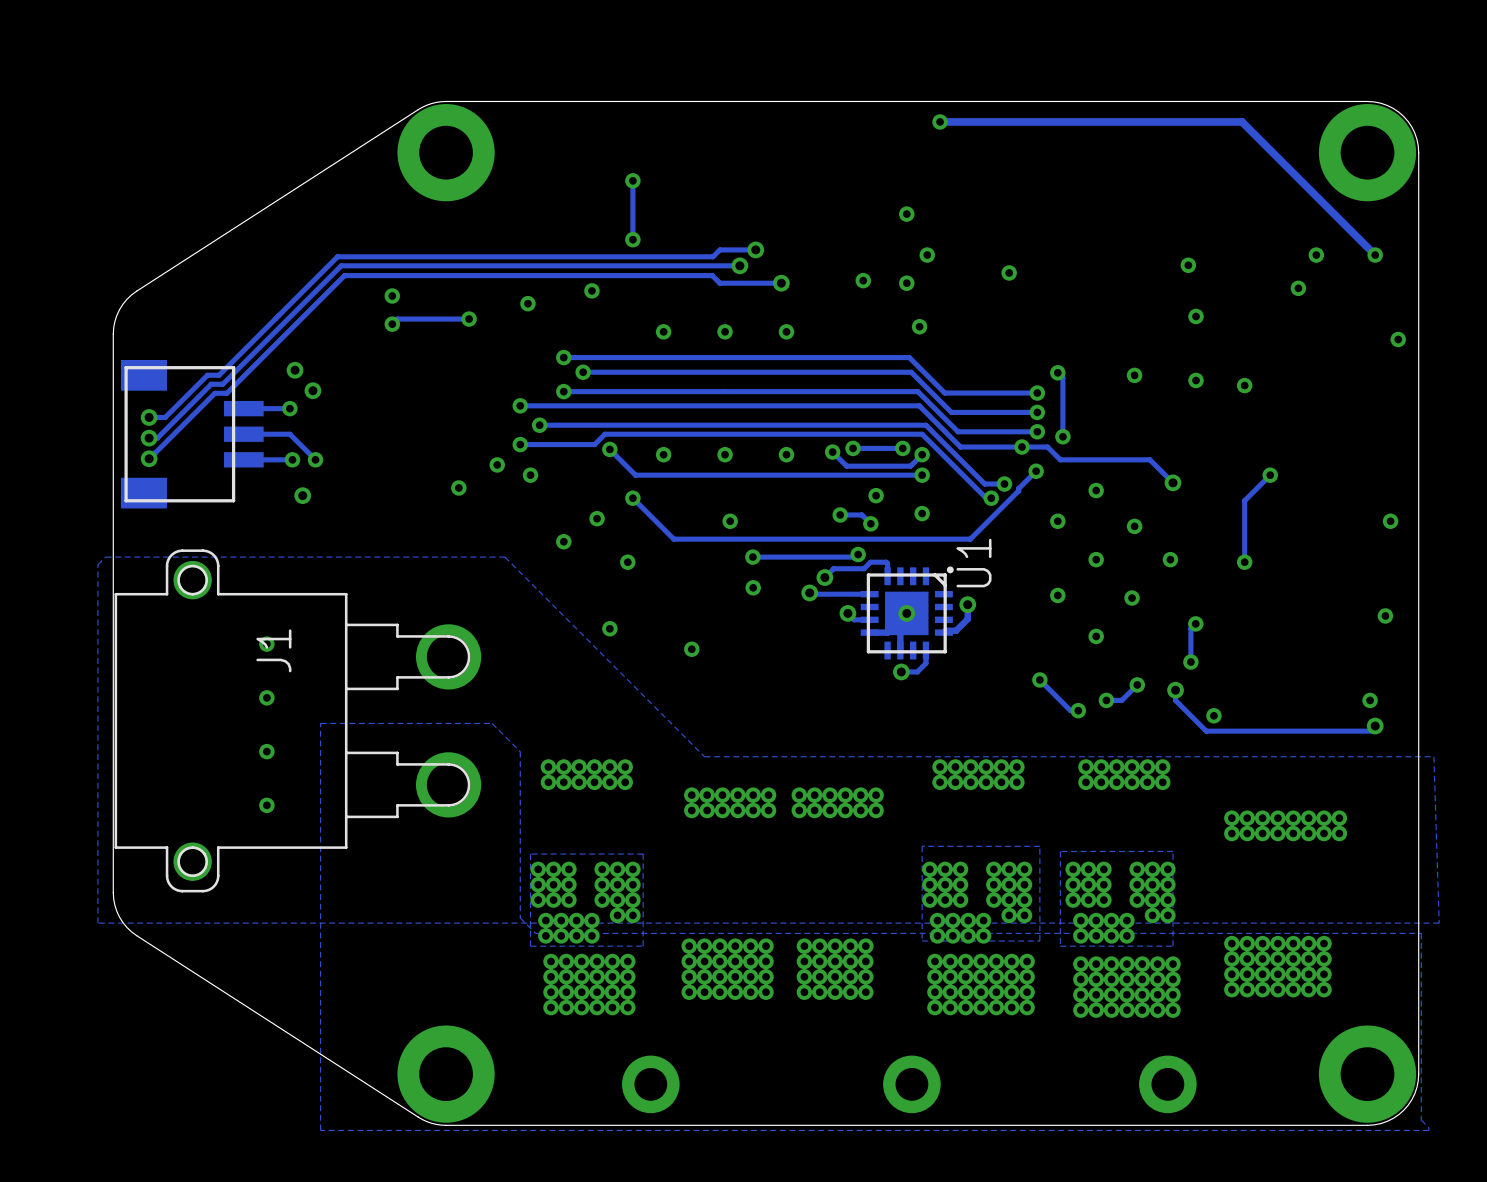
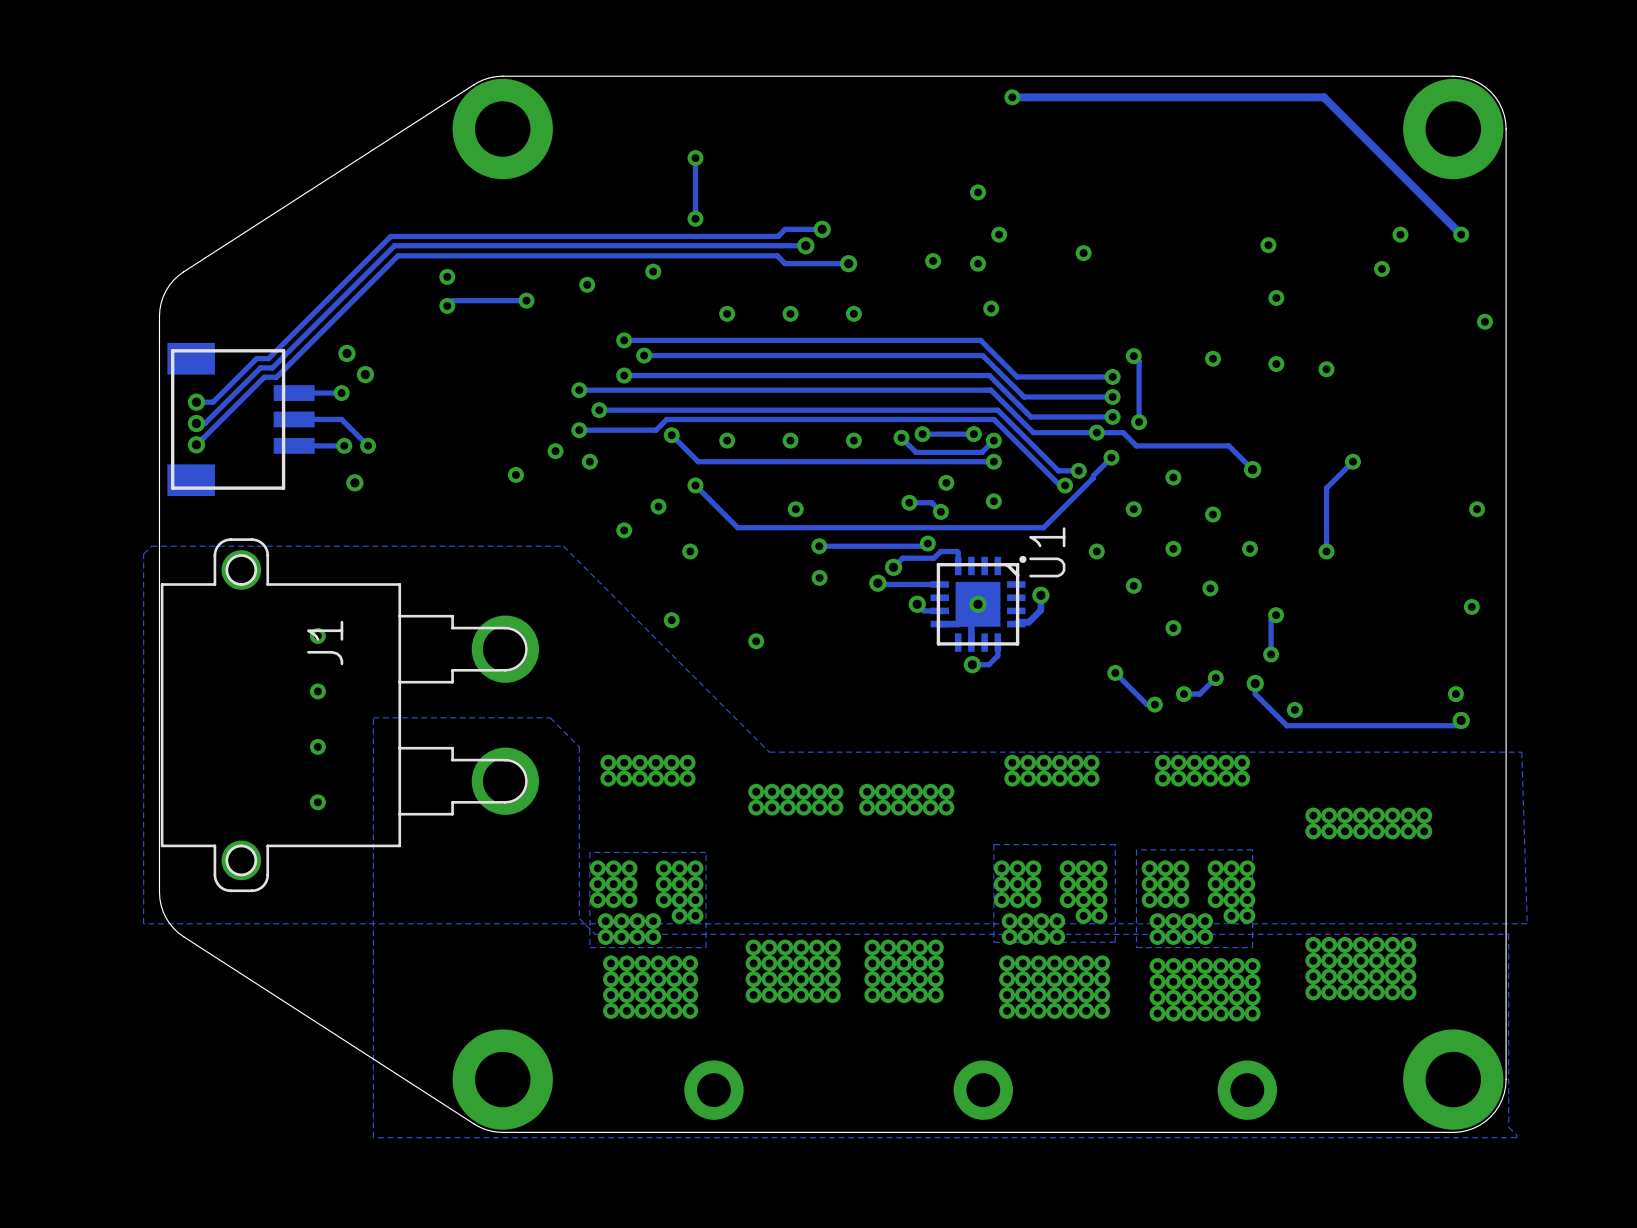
via: none -> (1096, 551)

